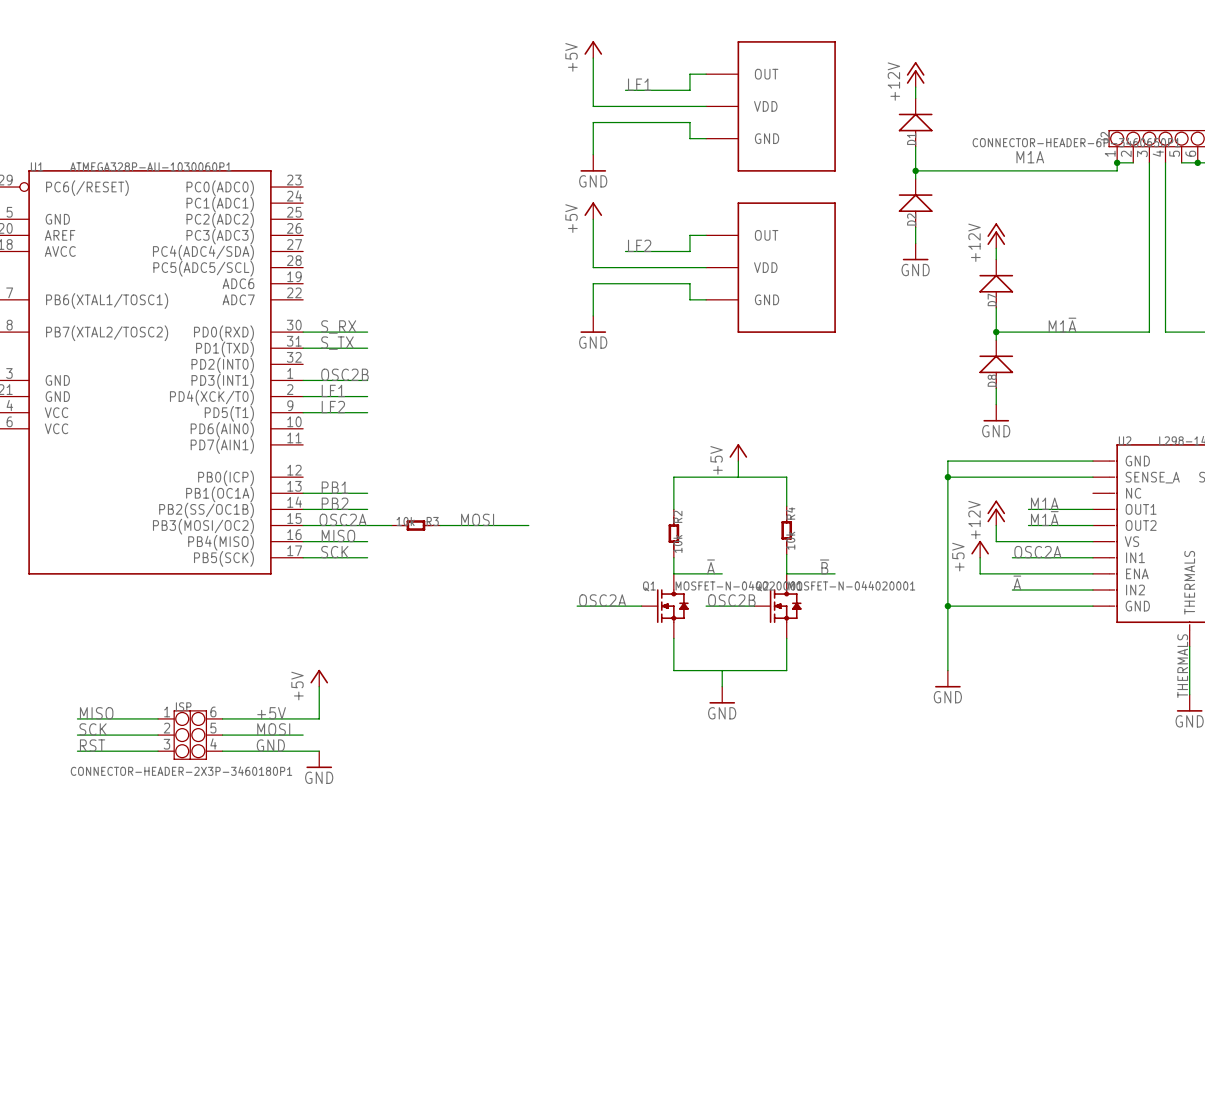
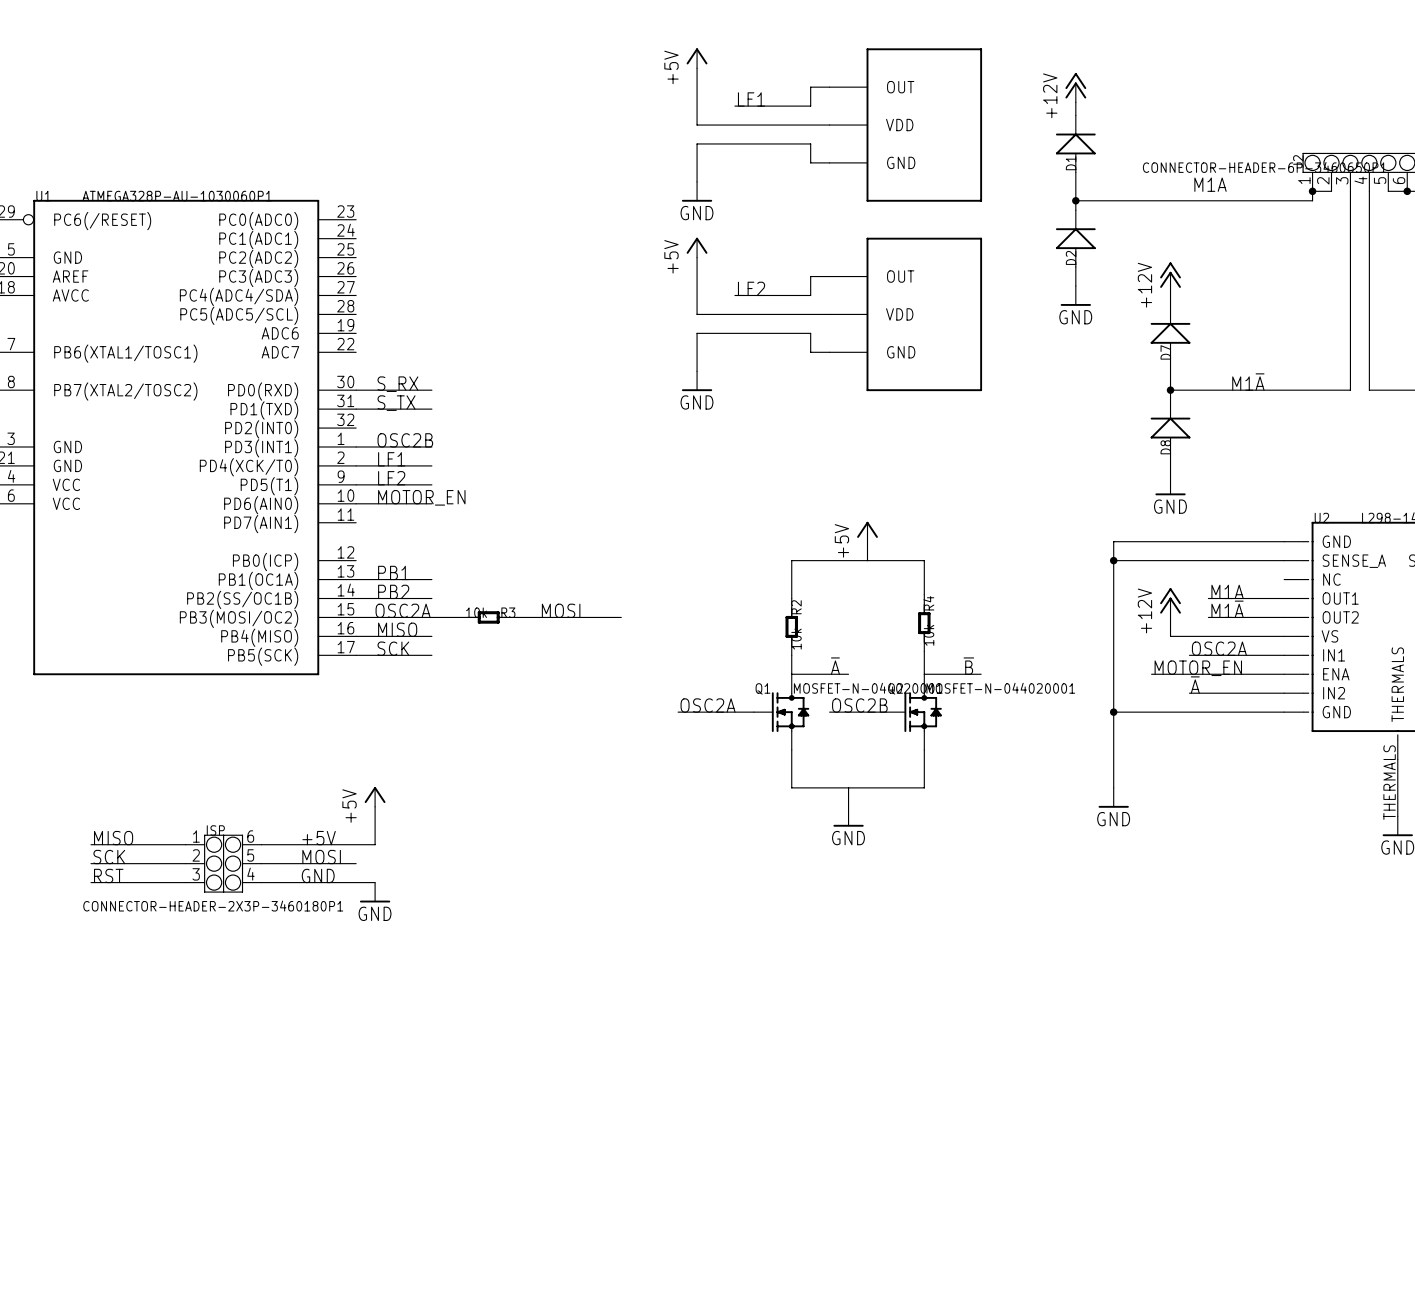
label: none -> MOTOR_EN (421, 497)
wire: none -> (356, 503) (431, 503)
power symbol: +5V (980, 549) -> none
wire: (980, 557) (980, 573) -> none
label: none -> MOTOR_EN (1198, 668)

